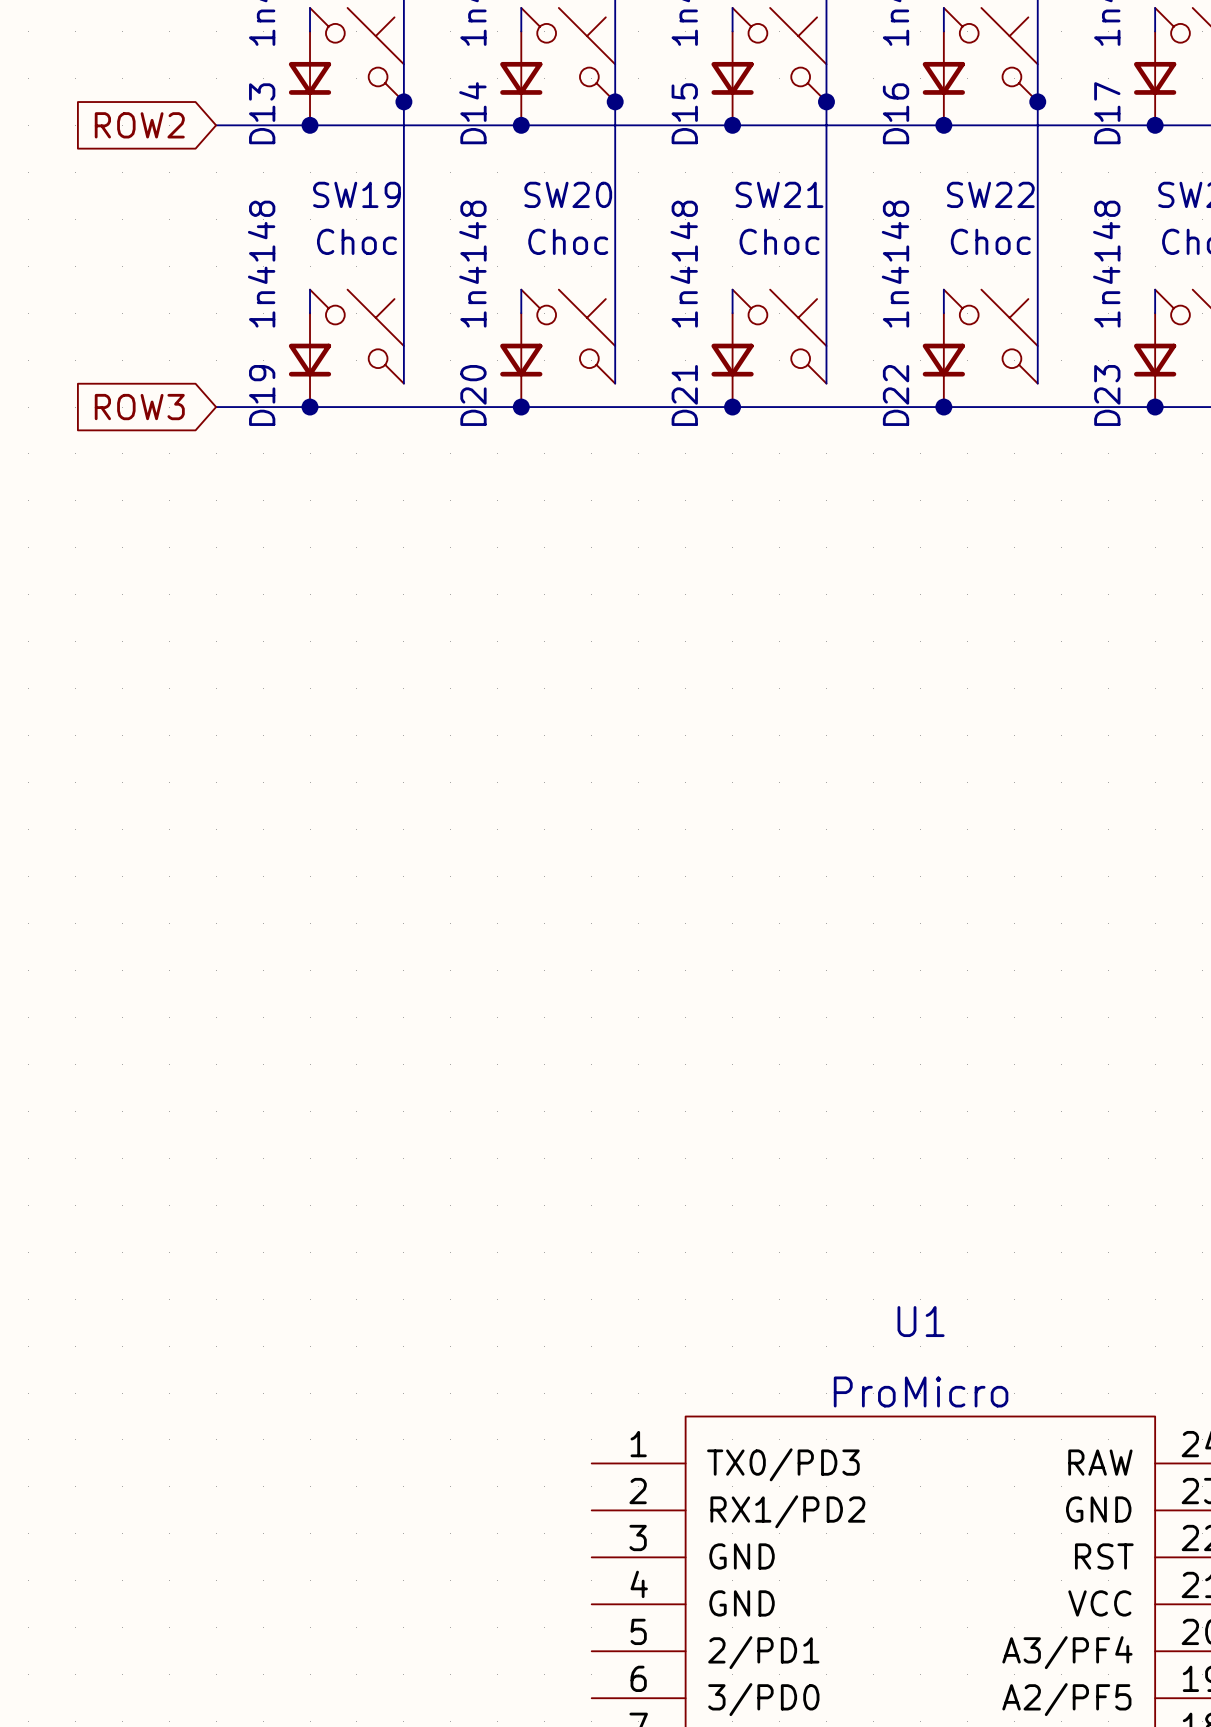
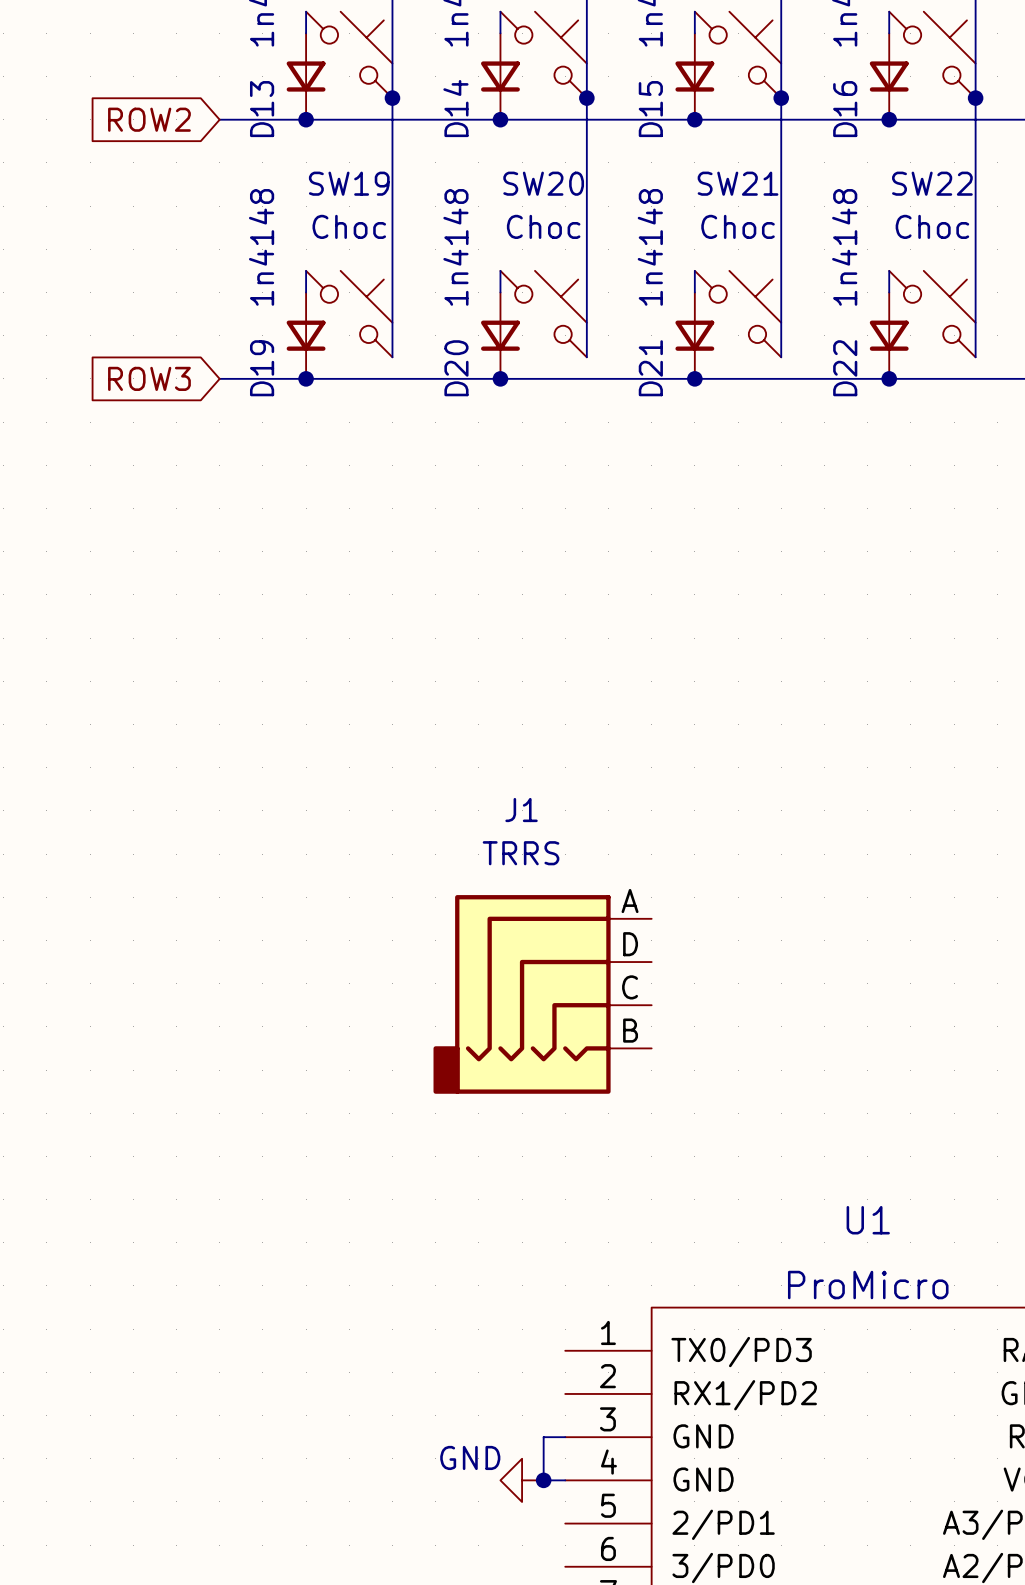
J1: none -> TRRS (542, 994)
wire: none -> (565, 1437) (543, 1437) (543, 1480) (565, 1480)
power symbol: none -> GND (522, 1480)
junction: none -> (543, 1480)

